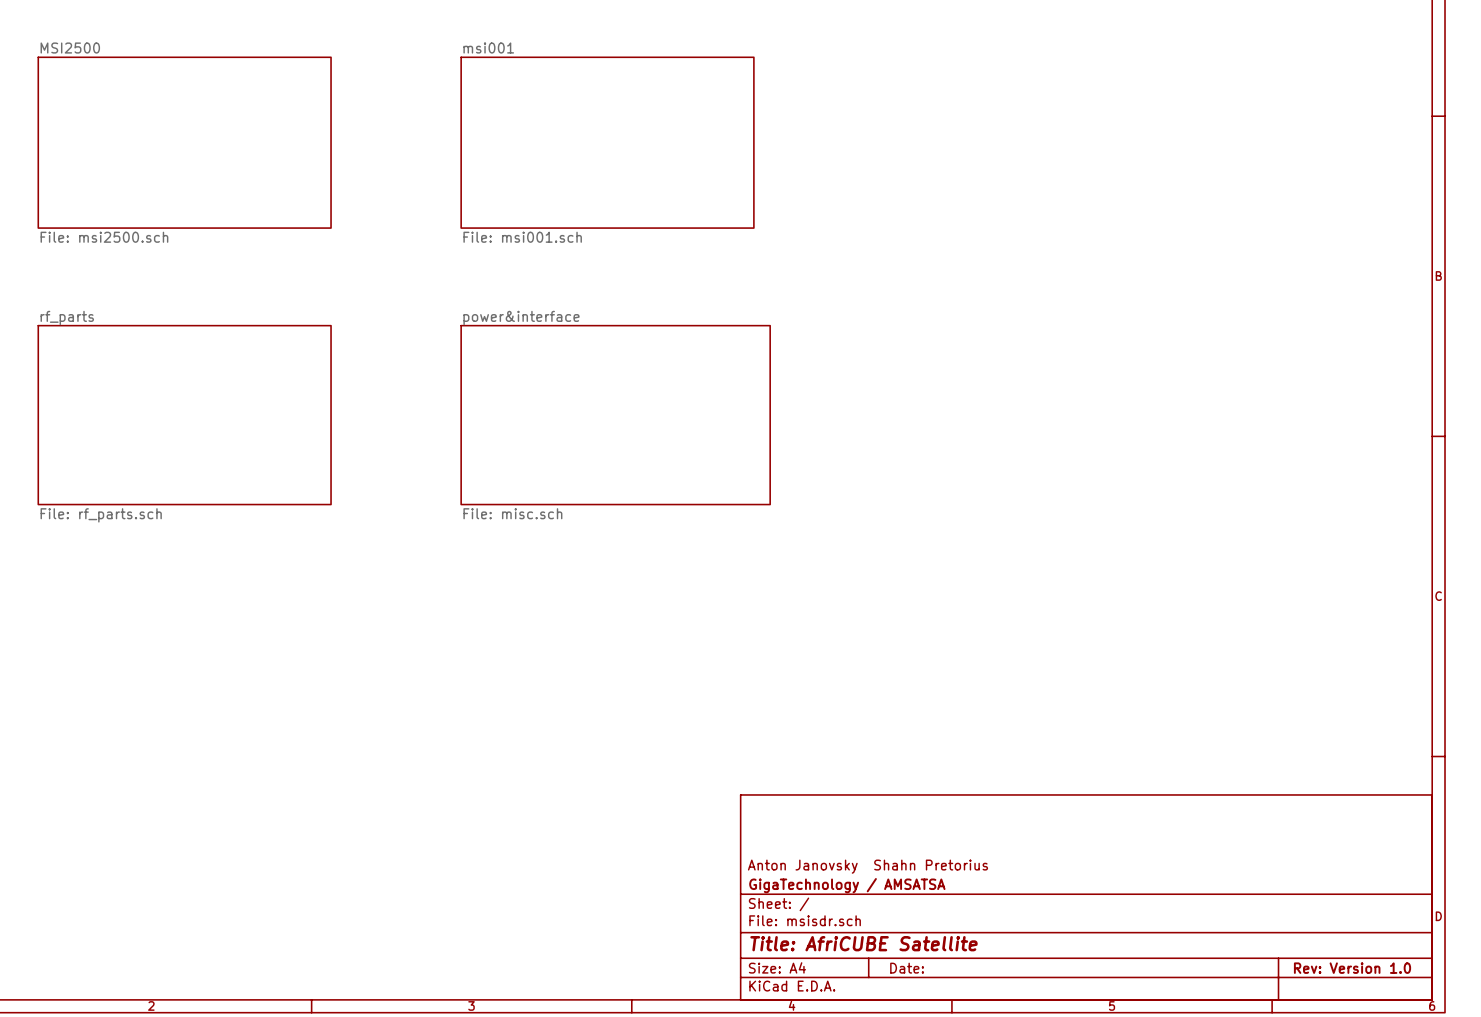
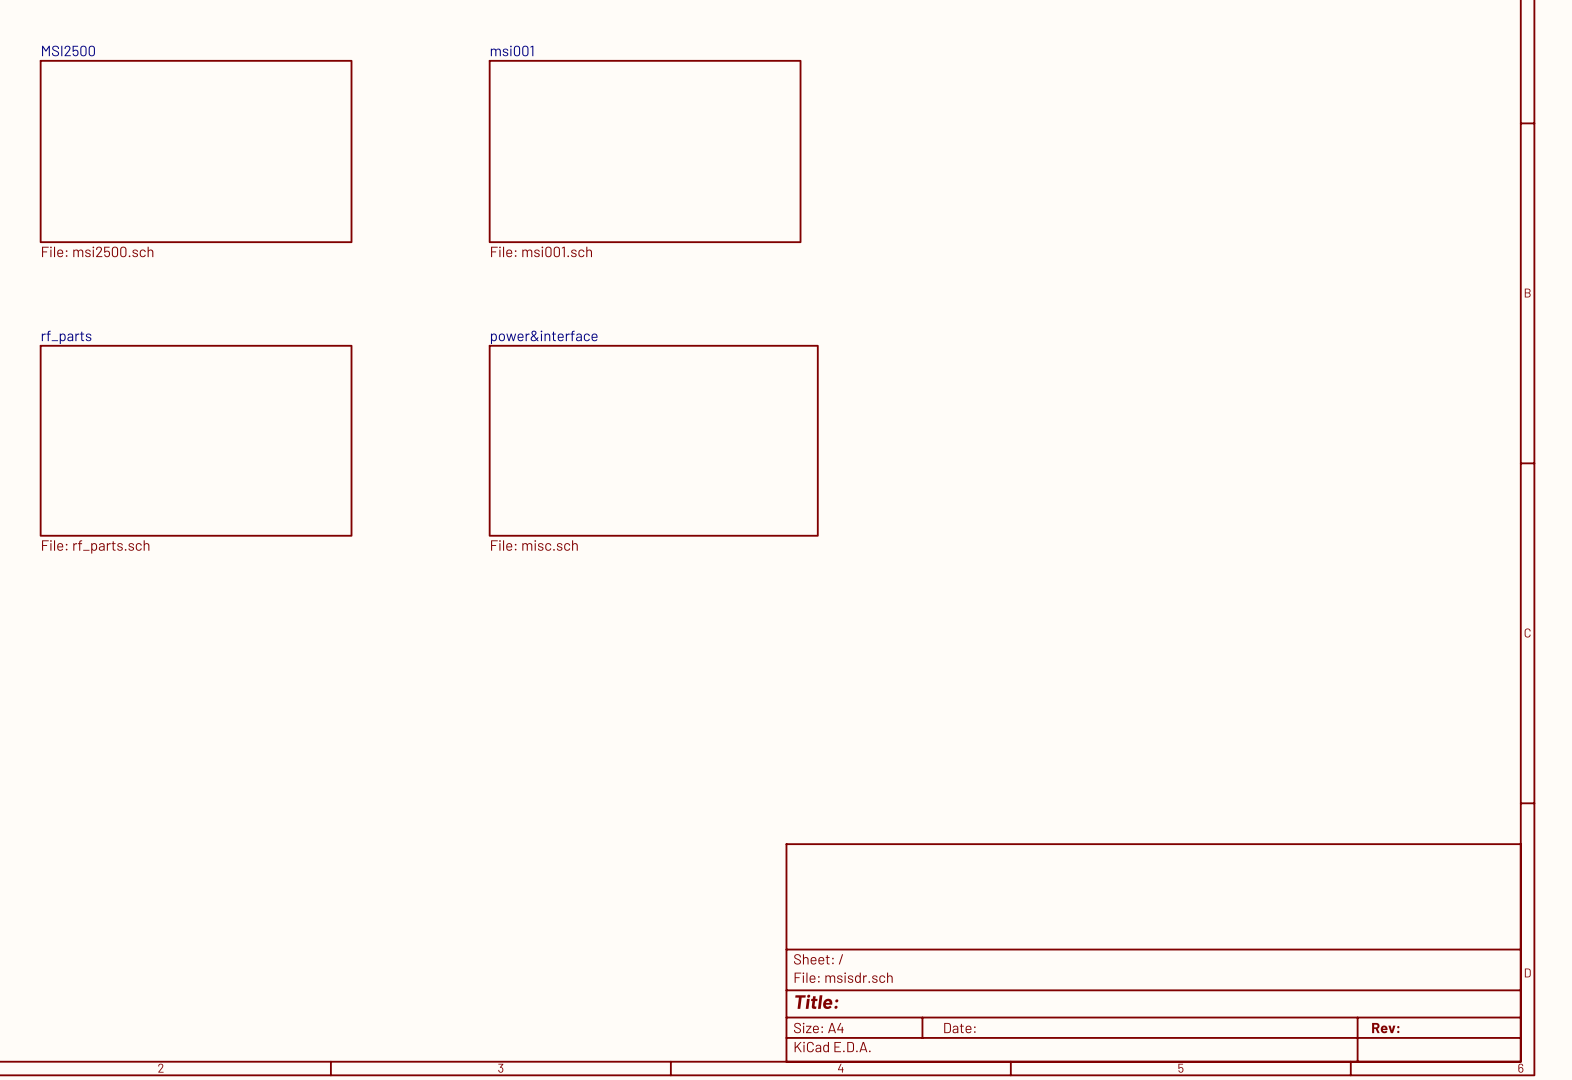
title block: Anton Janovsky Shahn Pretorius (867, 866) -> none
title block: GigaTechnology / AMSATSA (847, 885) -> none
title block: Title: AfriCUBE Satellite (864, 943) -> Title: (816, 1001)
title block: Rev: Version 1.0 (1352, 968) -> Rev: (1385, 1028)

